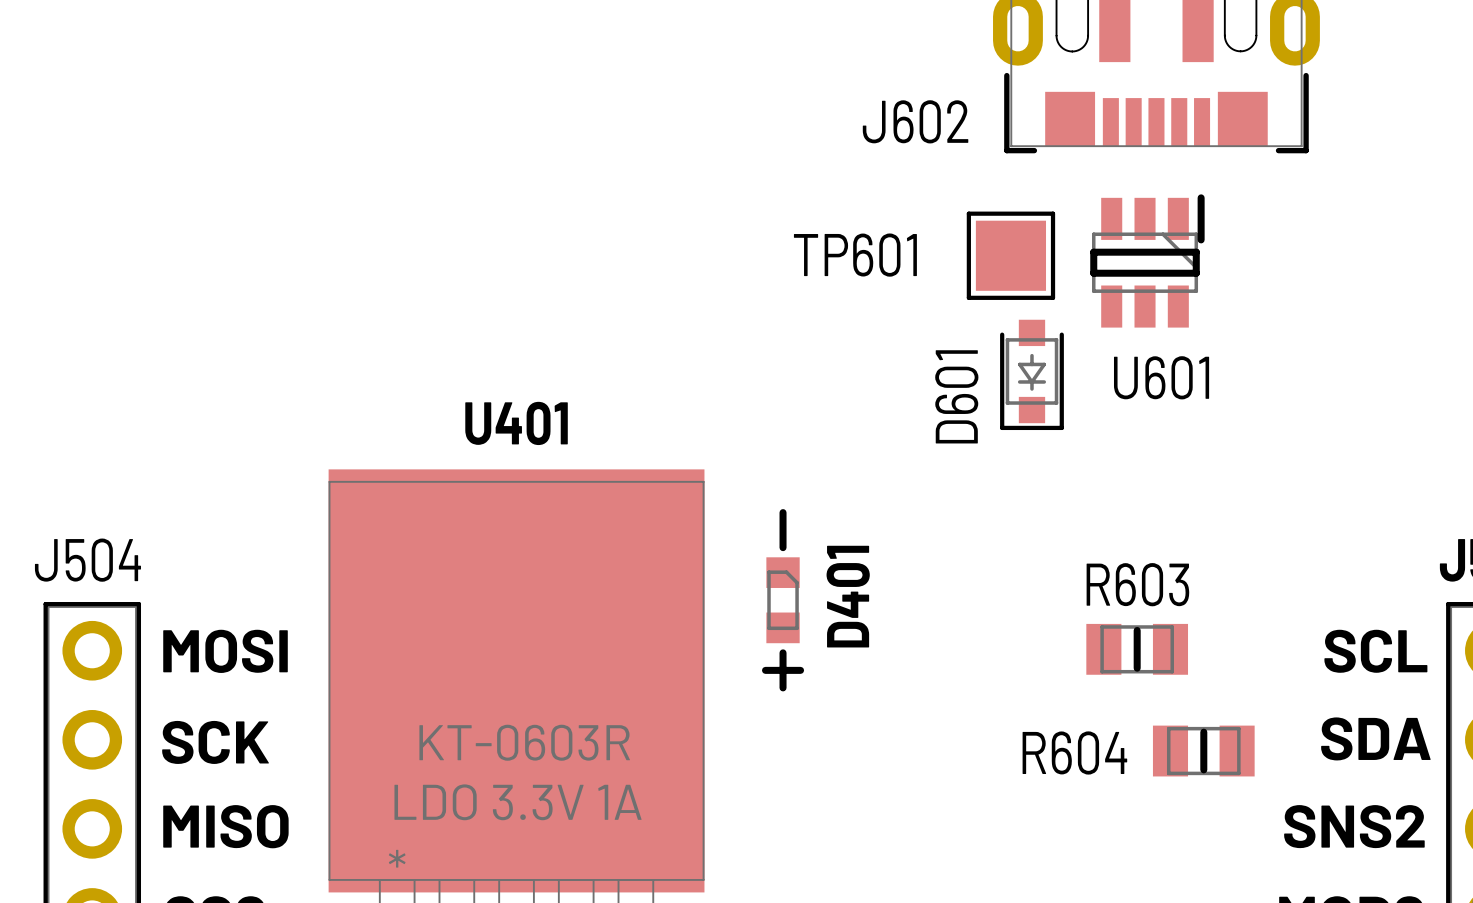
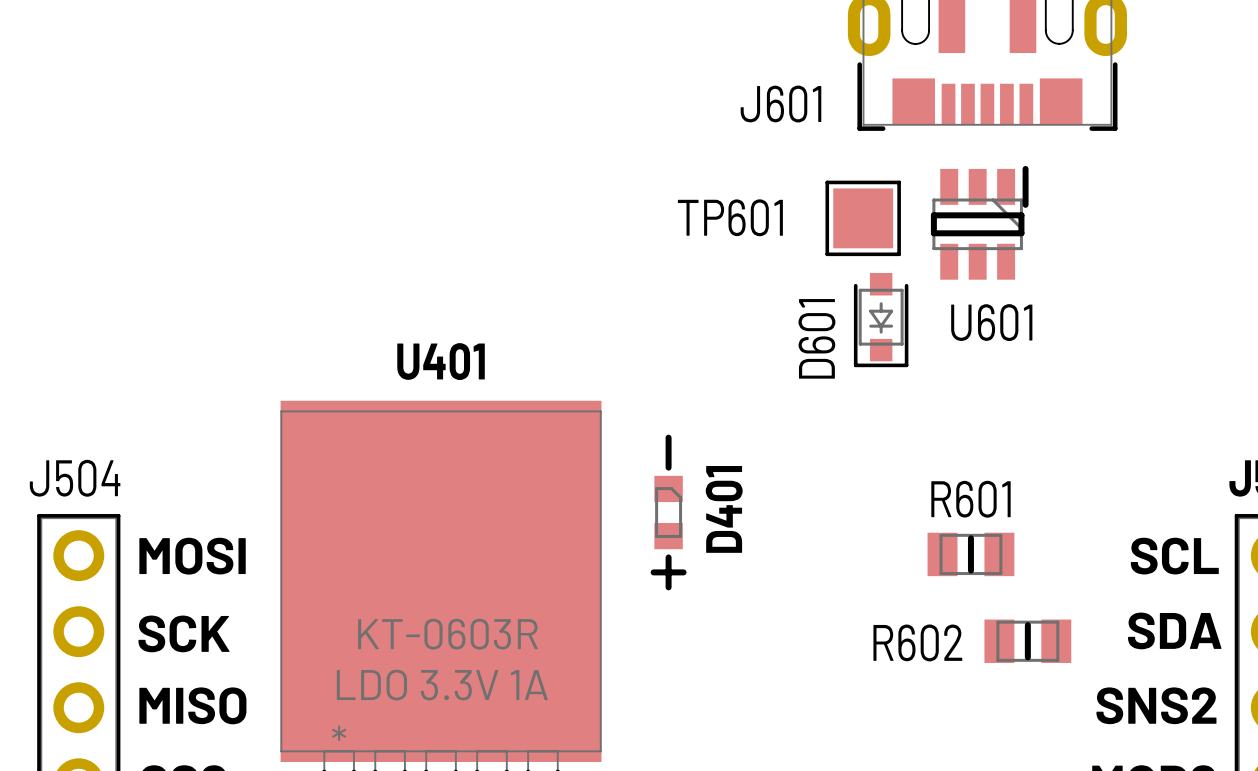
J602 name: J602 (915, 121) -> J601 (780, 104)
R603 name: R603 (1137, 584) -> R601 (970, 499)
R604 name: R604 (1074, 752) -> R602 (917, 642)

